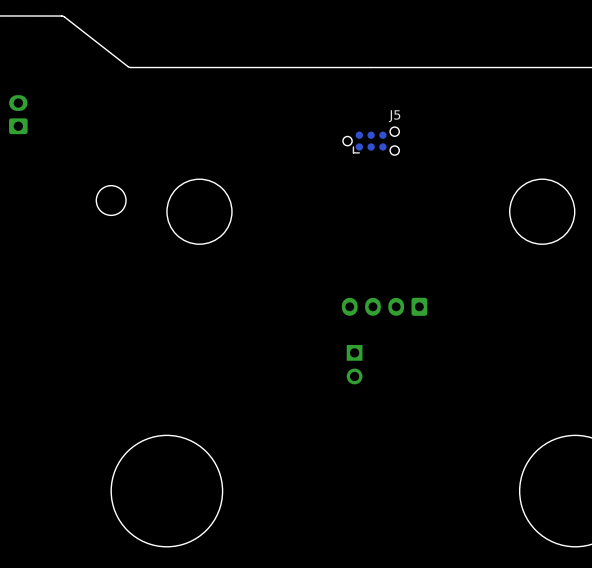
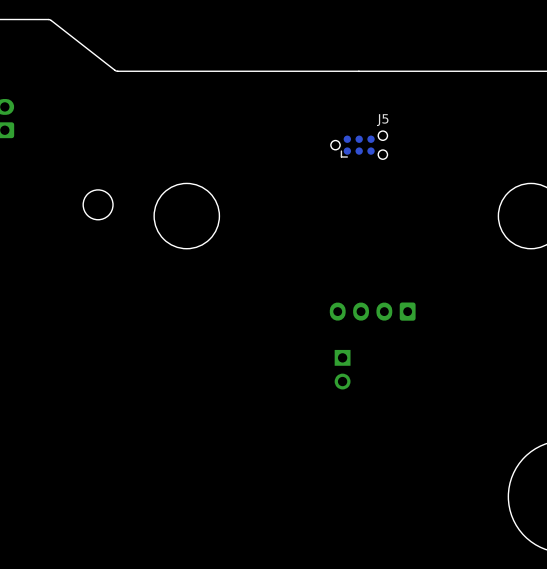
round board edge: [110, 435, 223, 548] -> none

